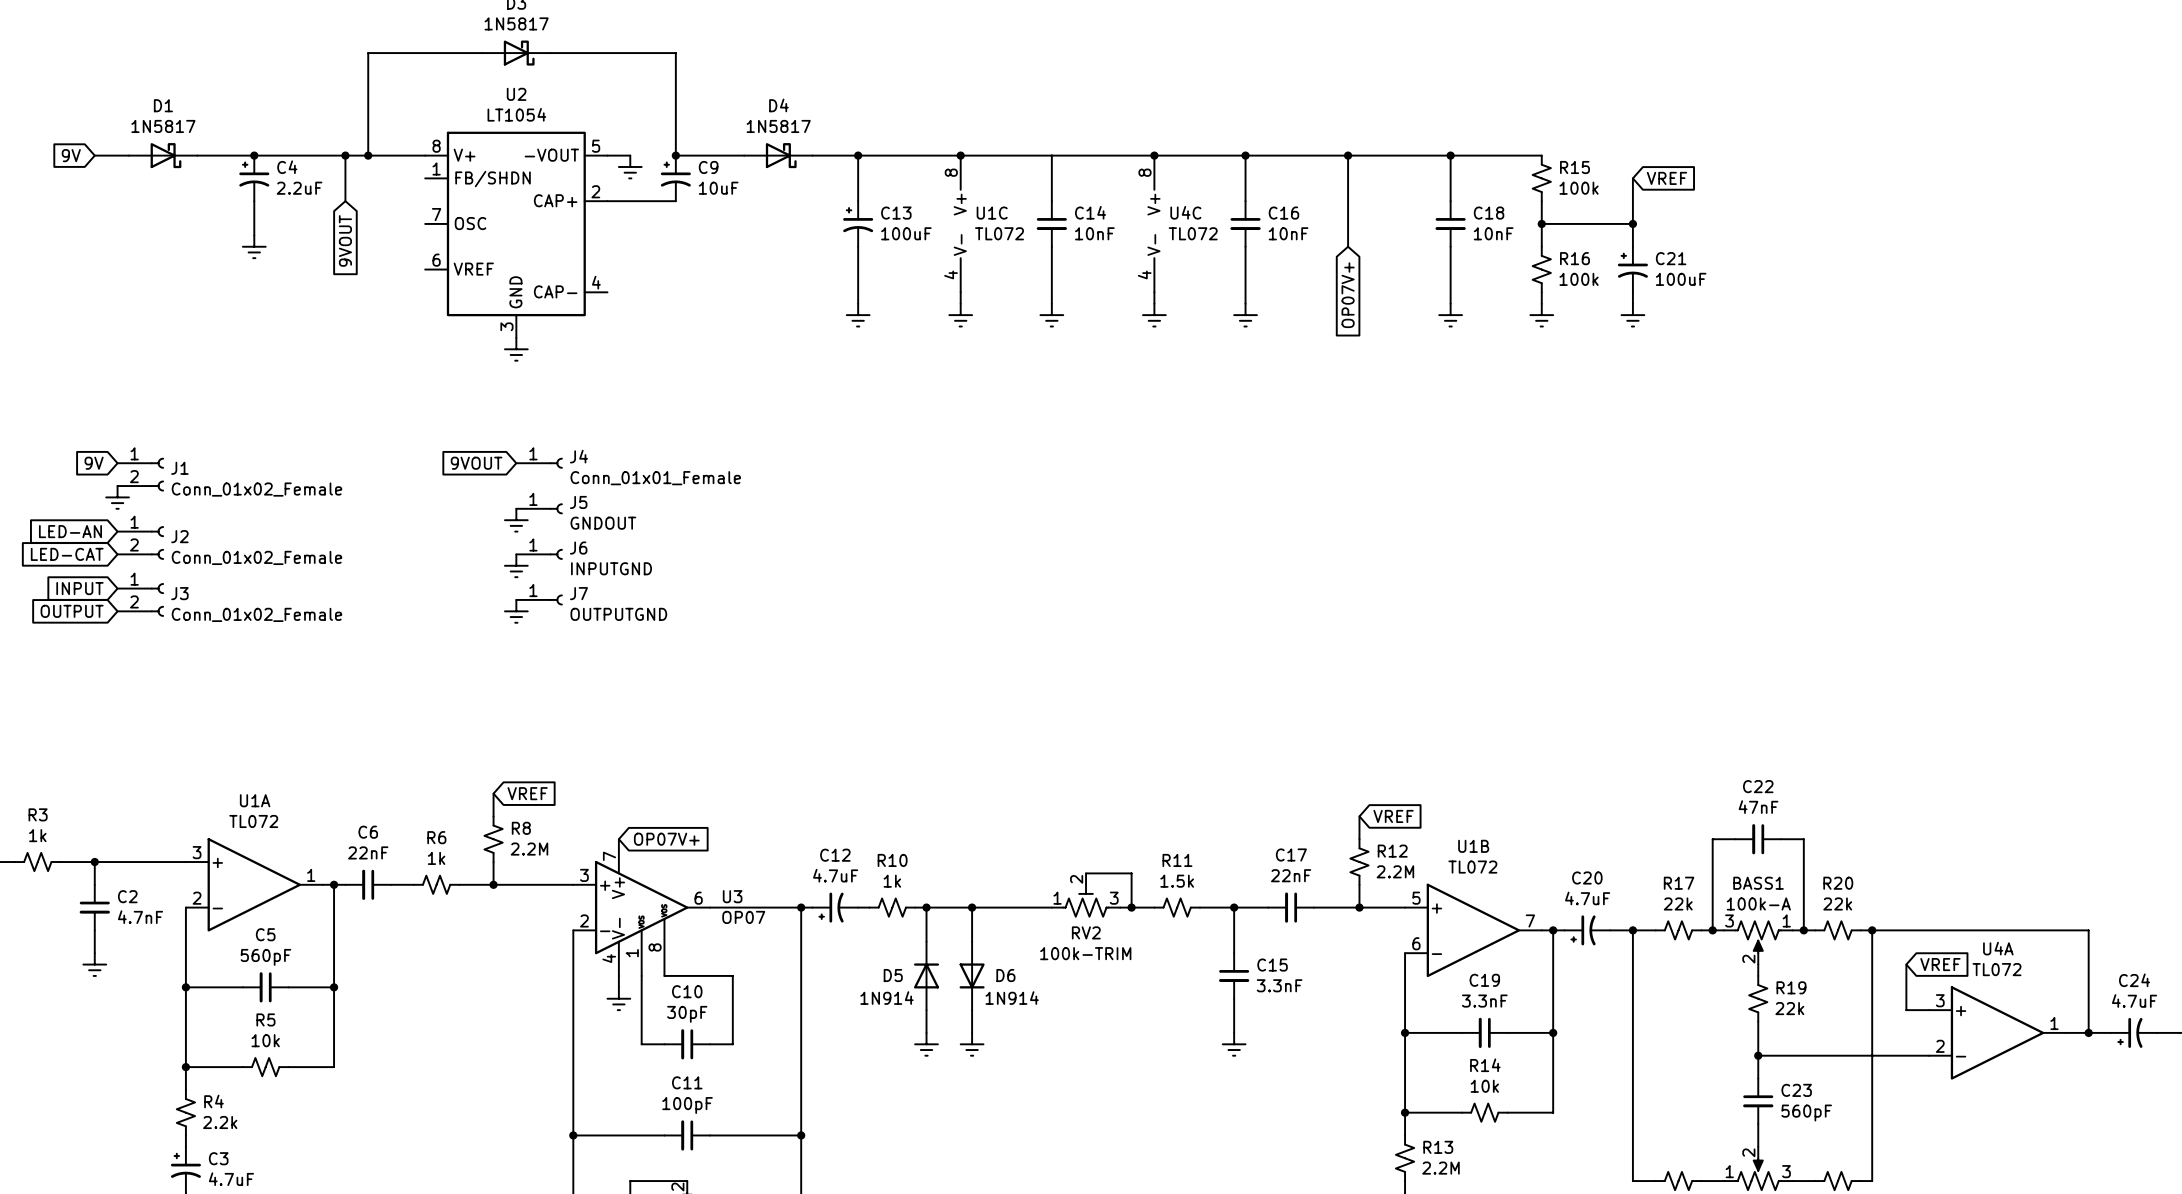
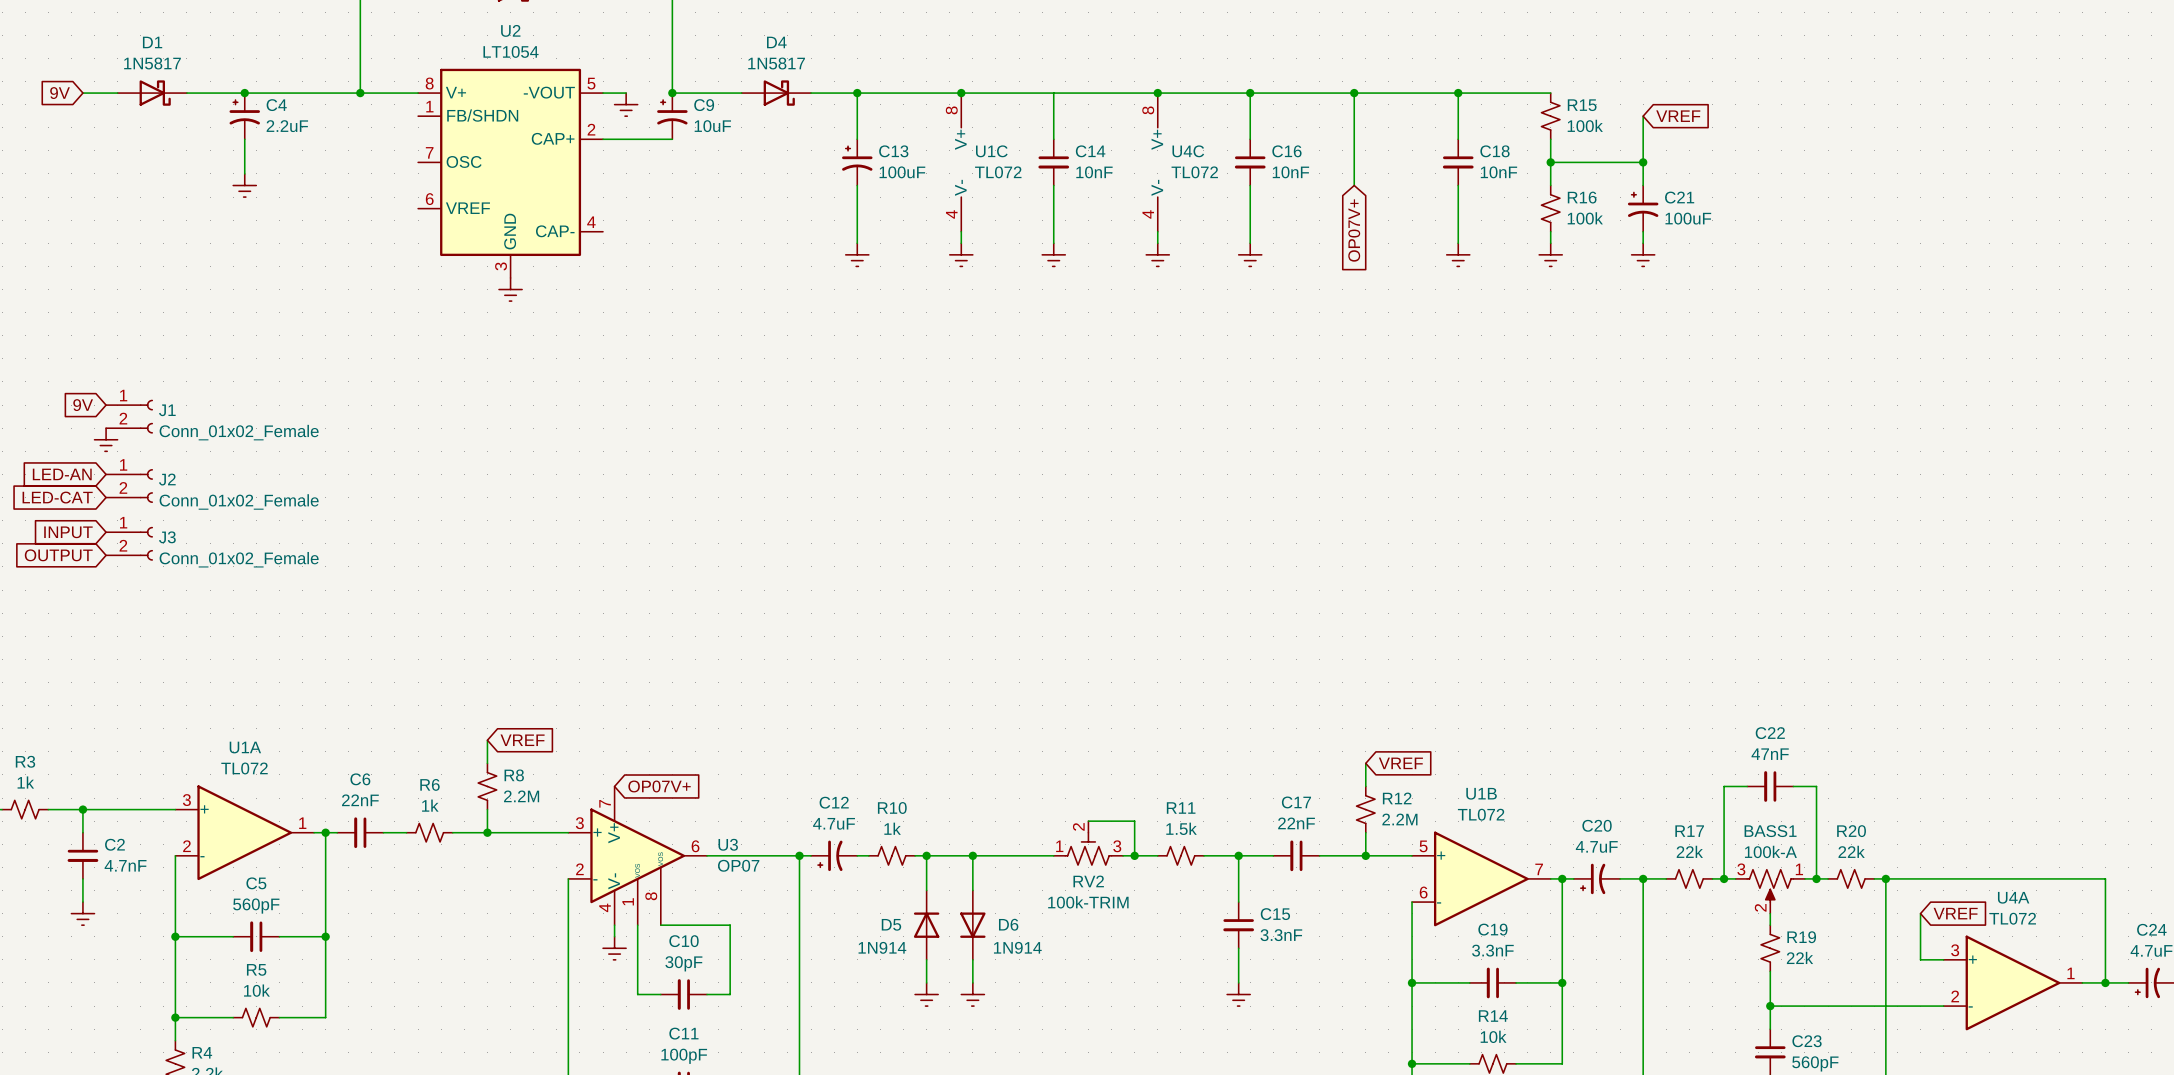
wire: (345, 155) (345, 201) -> none
junction: (345, 155) -> none
global label: 9VOUT (345, 240) -> none
global label: 9VOUT (476, 463) -> none
J4: Conn_01x01_Female (539, 463) -> none
J5: GNDOUT (539, 508) -> none
power symbol: (516, 520) -> none
J6: INPUTGND (539, 554) -> none
power symbol: (516, 565) -> none
J7: OUTPUTGND (539, 599) -> none
power symbol: (516, 611) -> none

